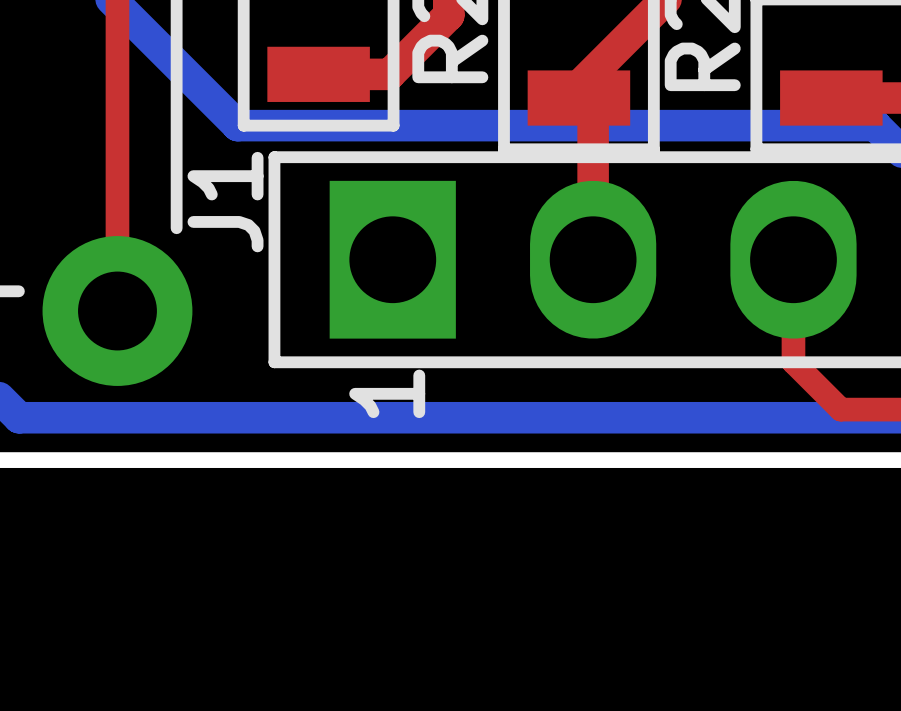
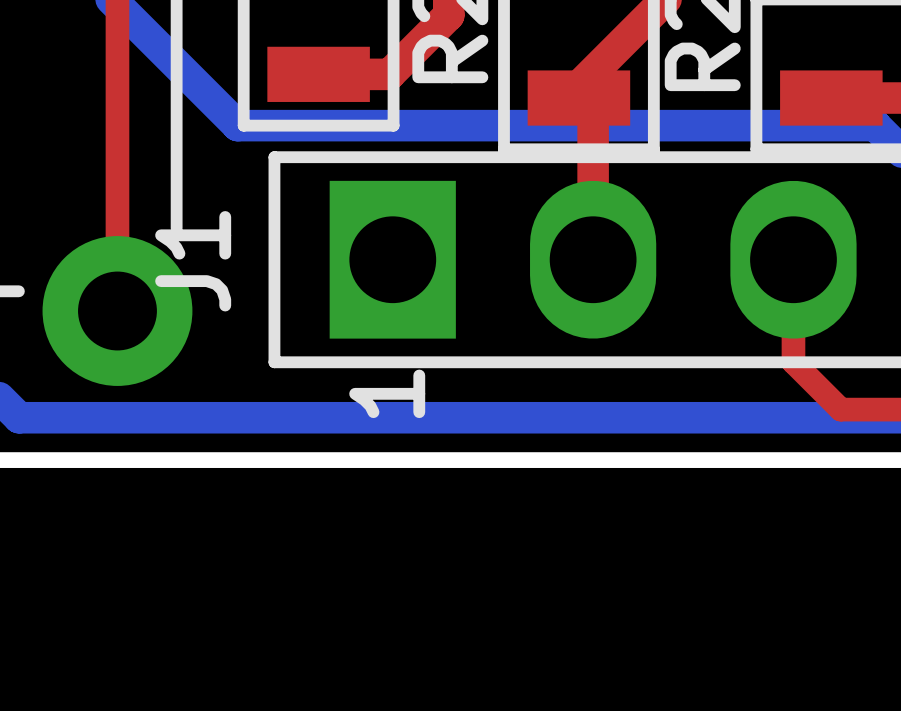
J1 name position: J1 (225, 202) -> J1 (193, 261)

